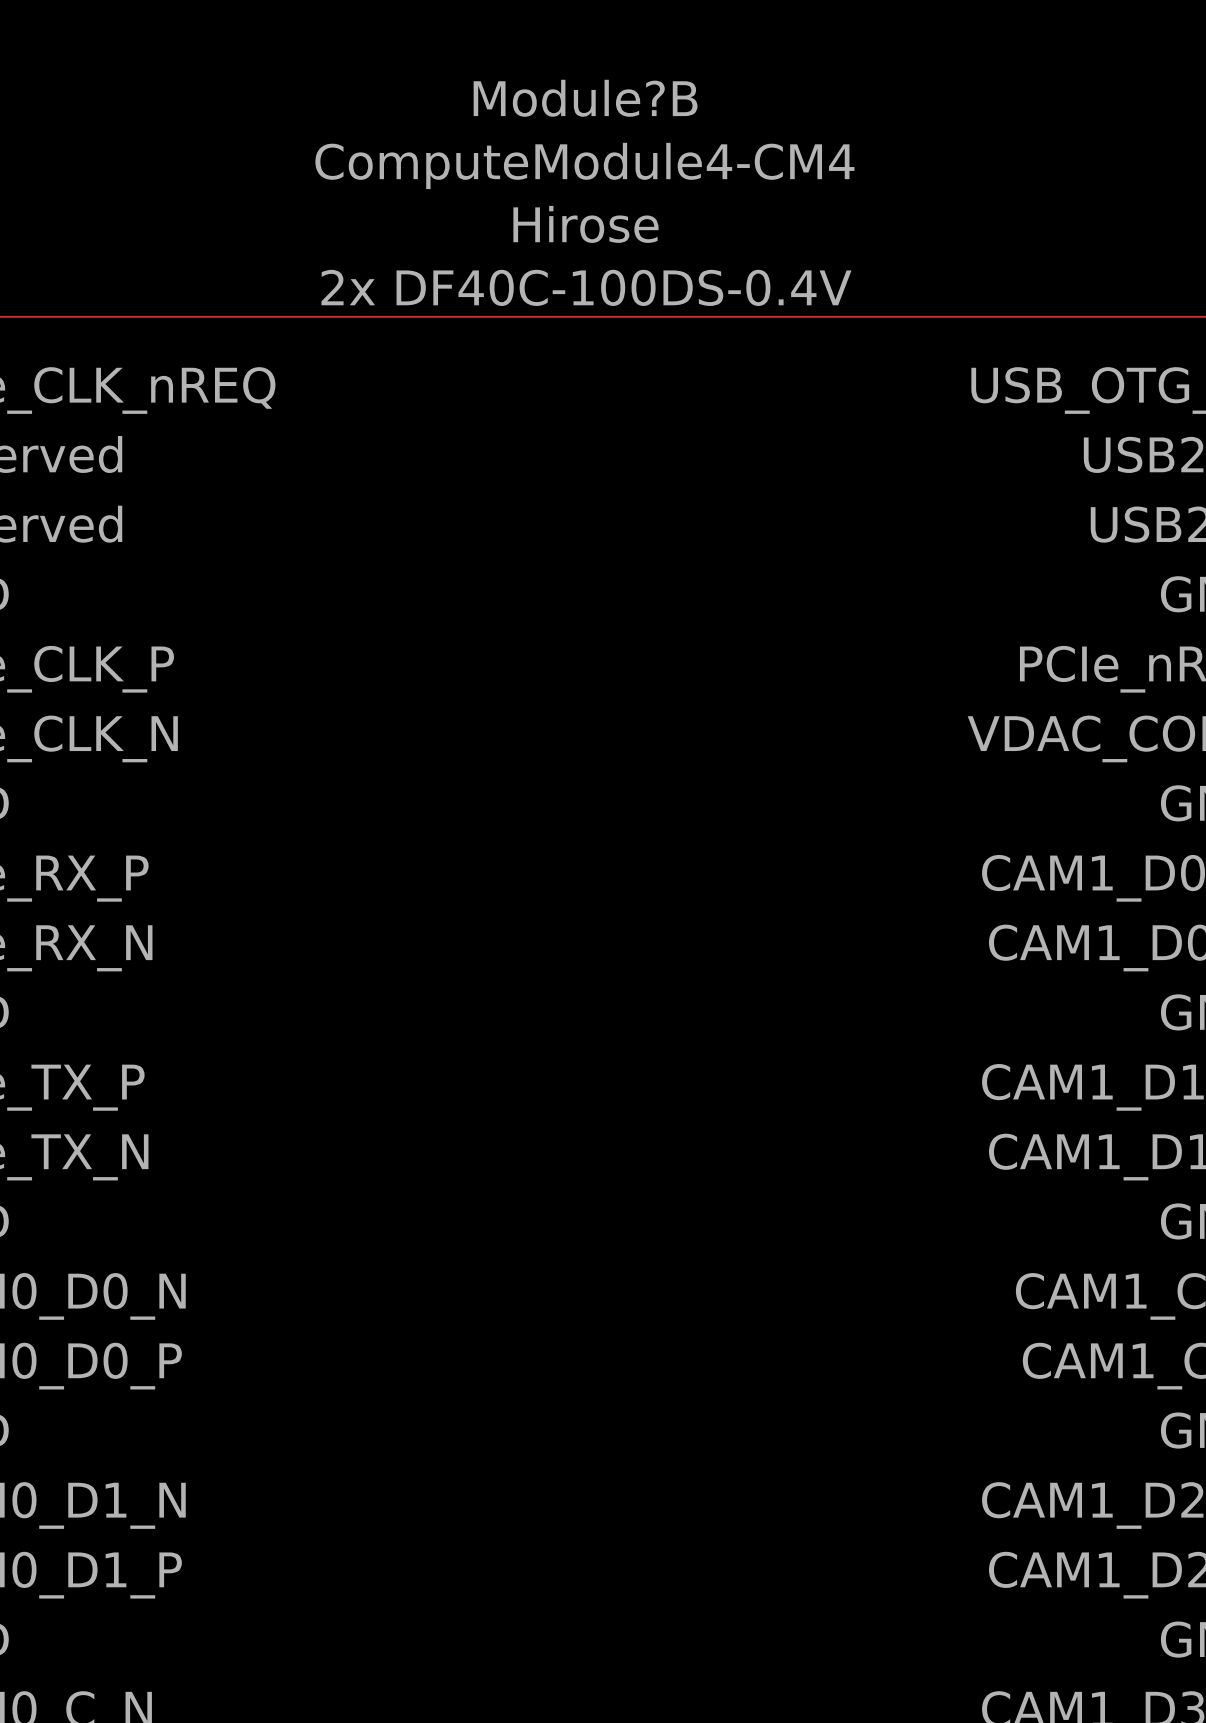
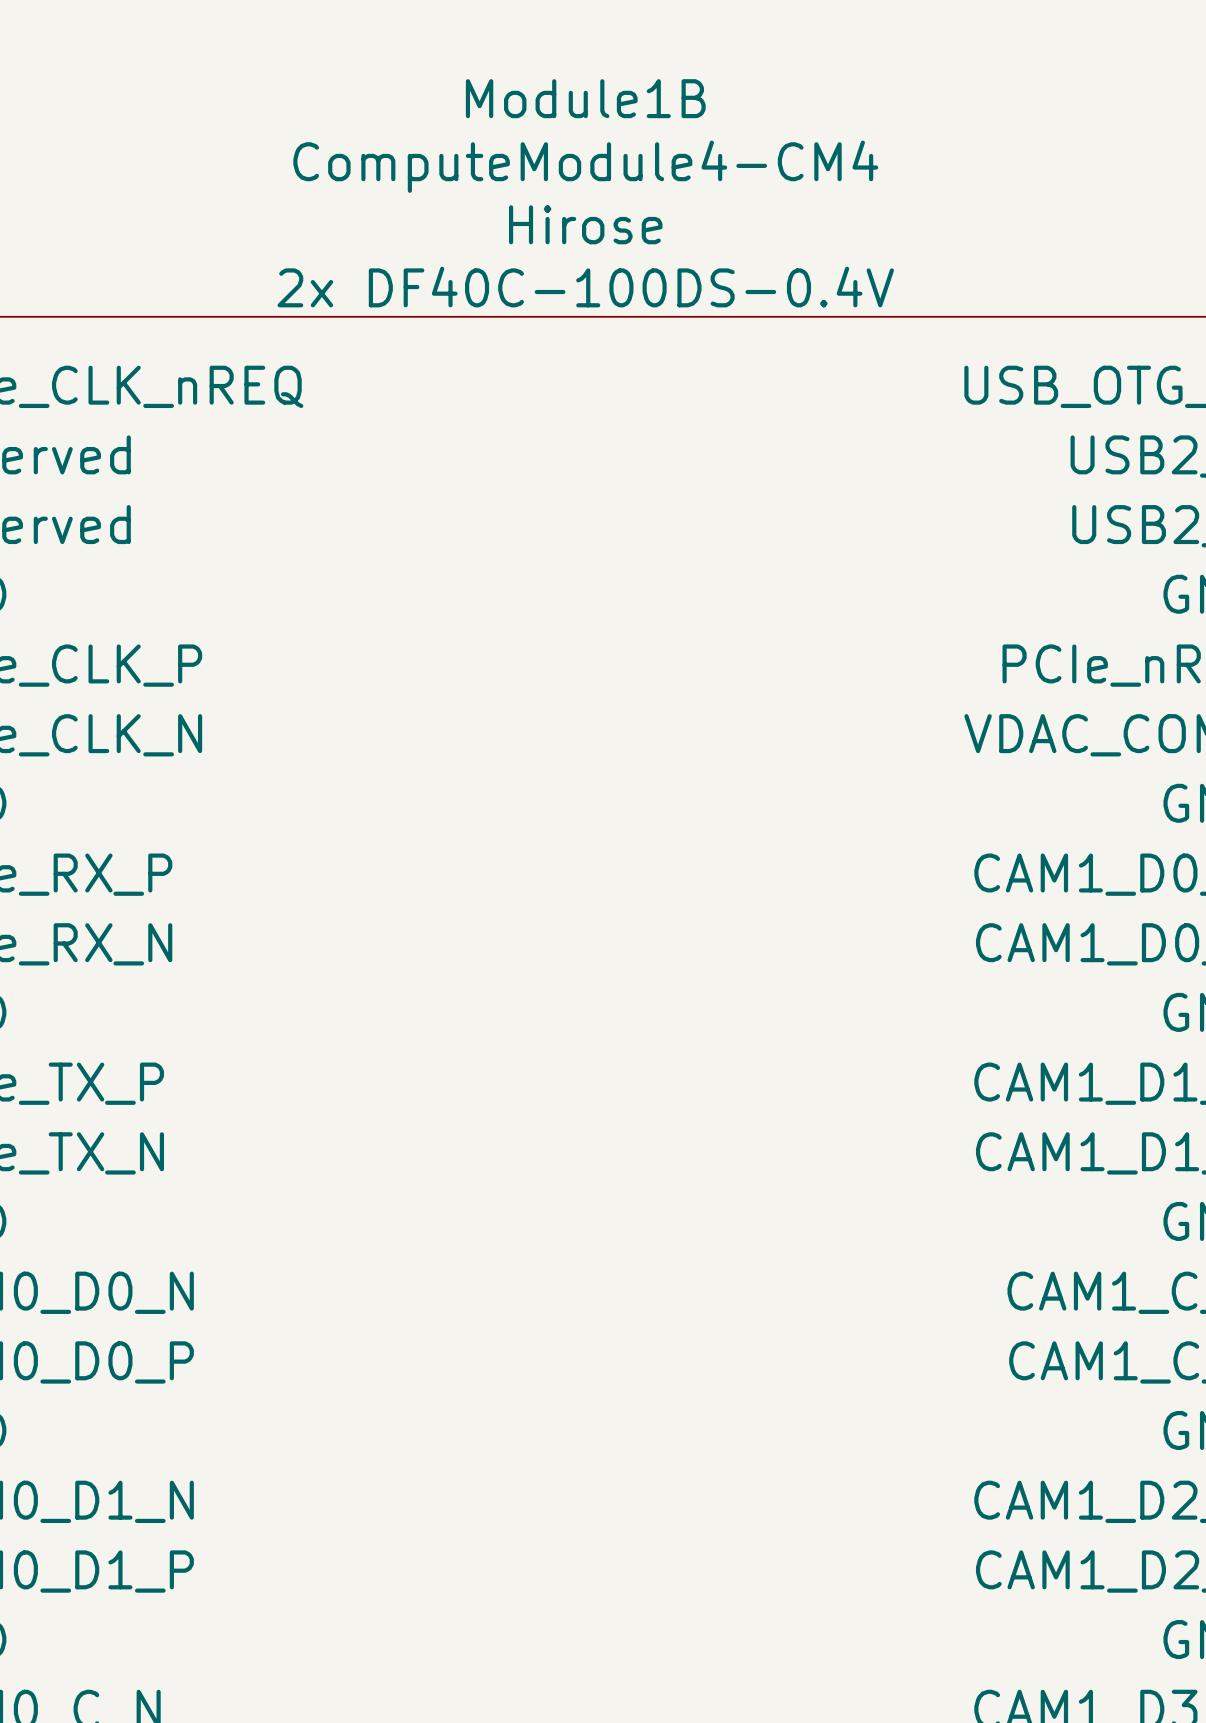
Module?B name: Module?B (585, 98) -> Module1B (585, 98)

